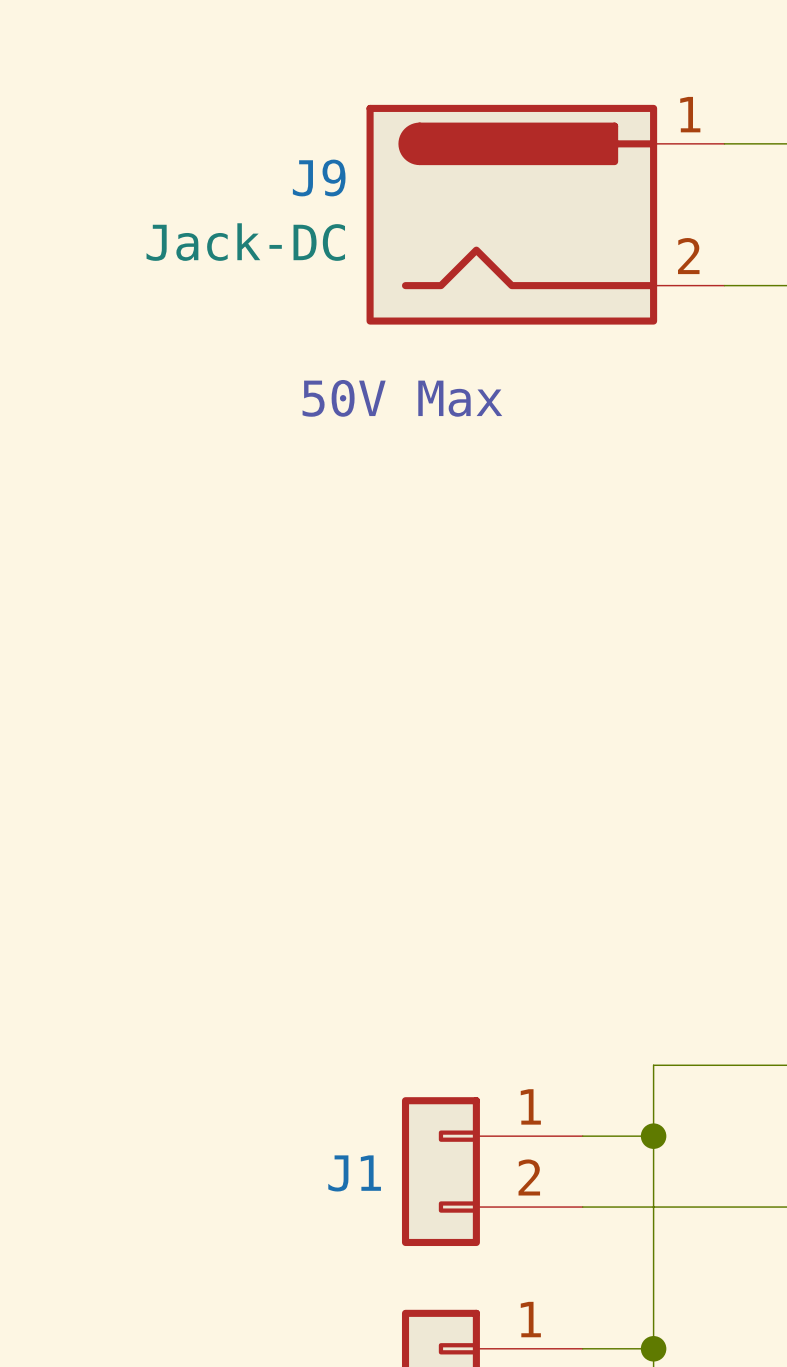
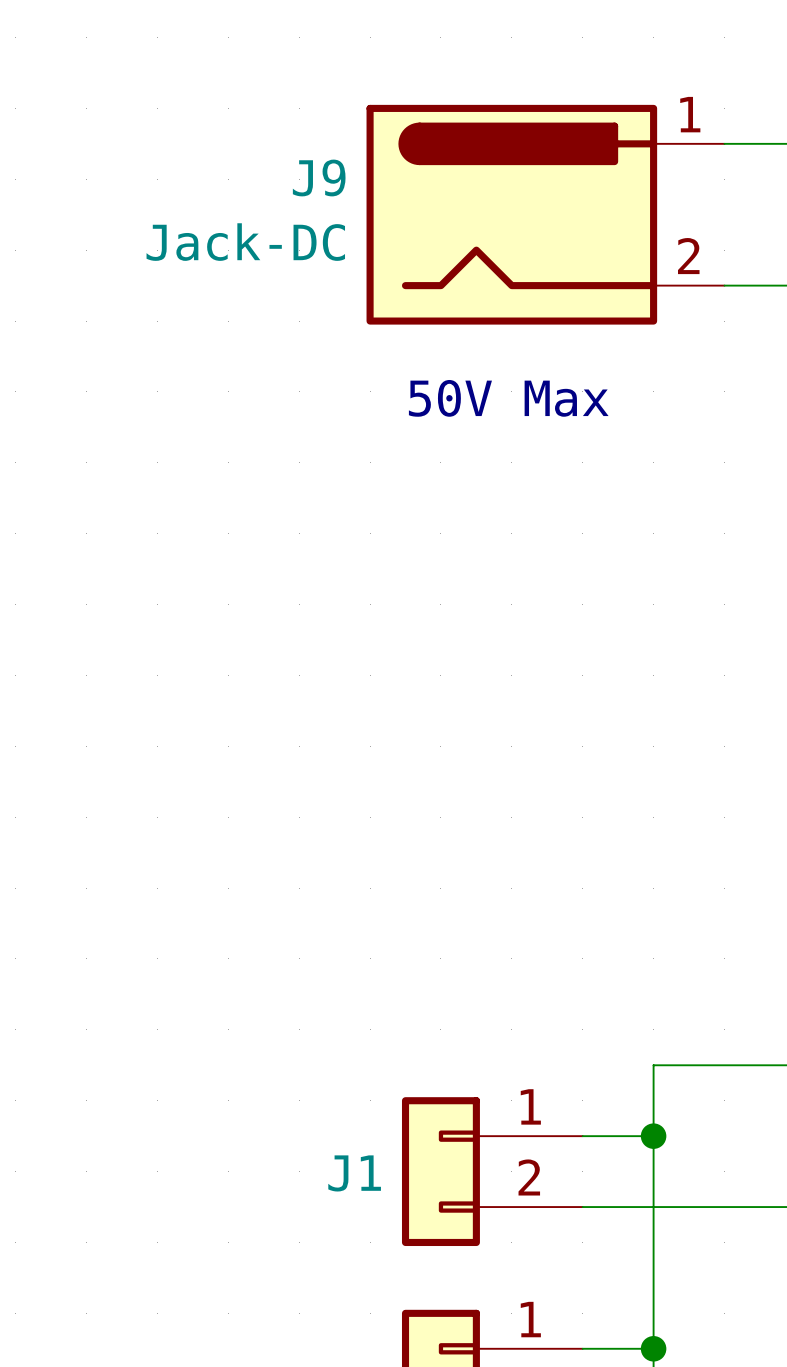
text position: 50V Max (402, 398) -> 50V Max (508, 398)

